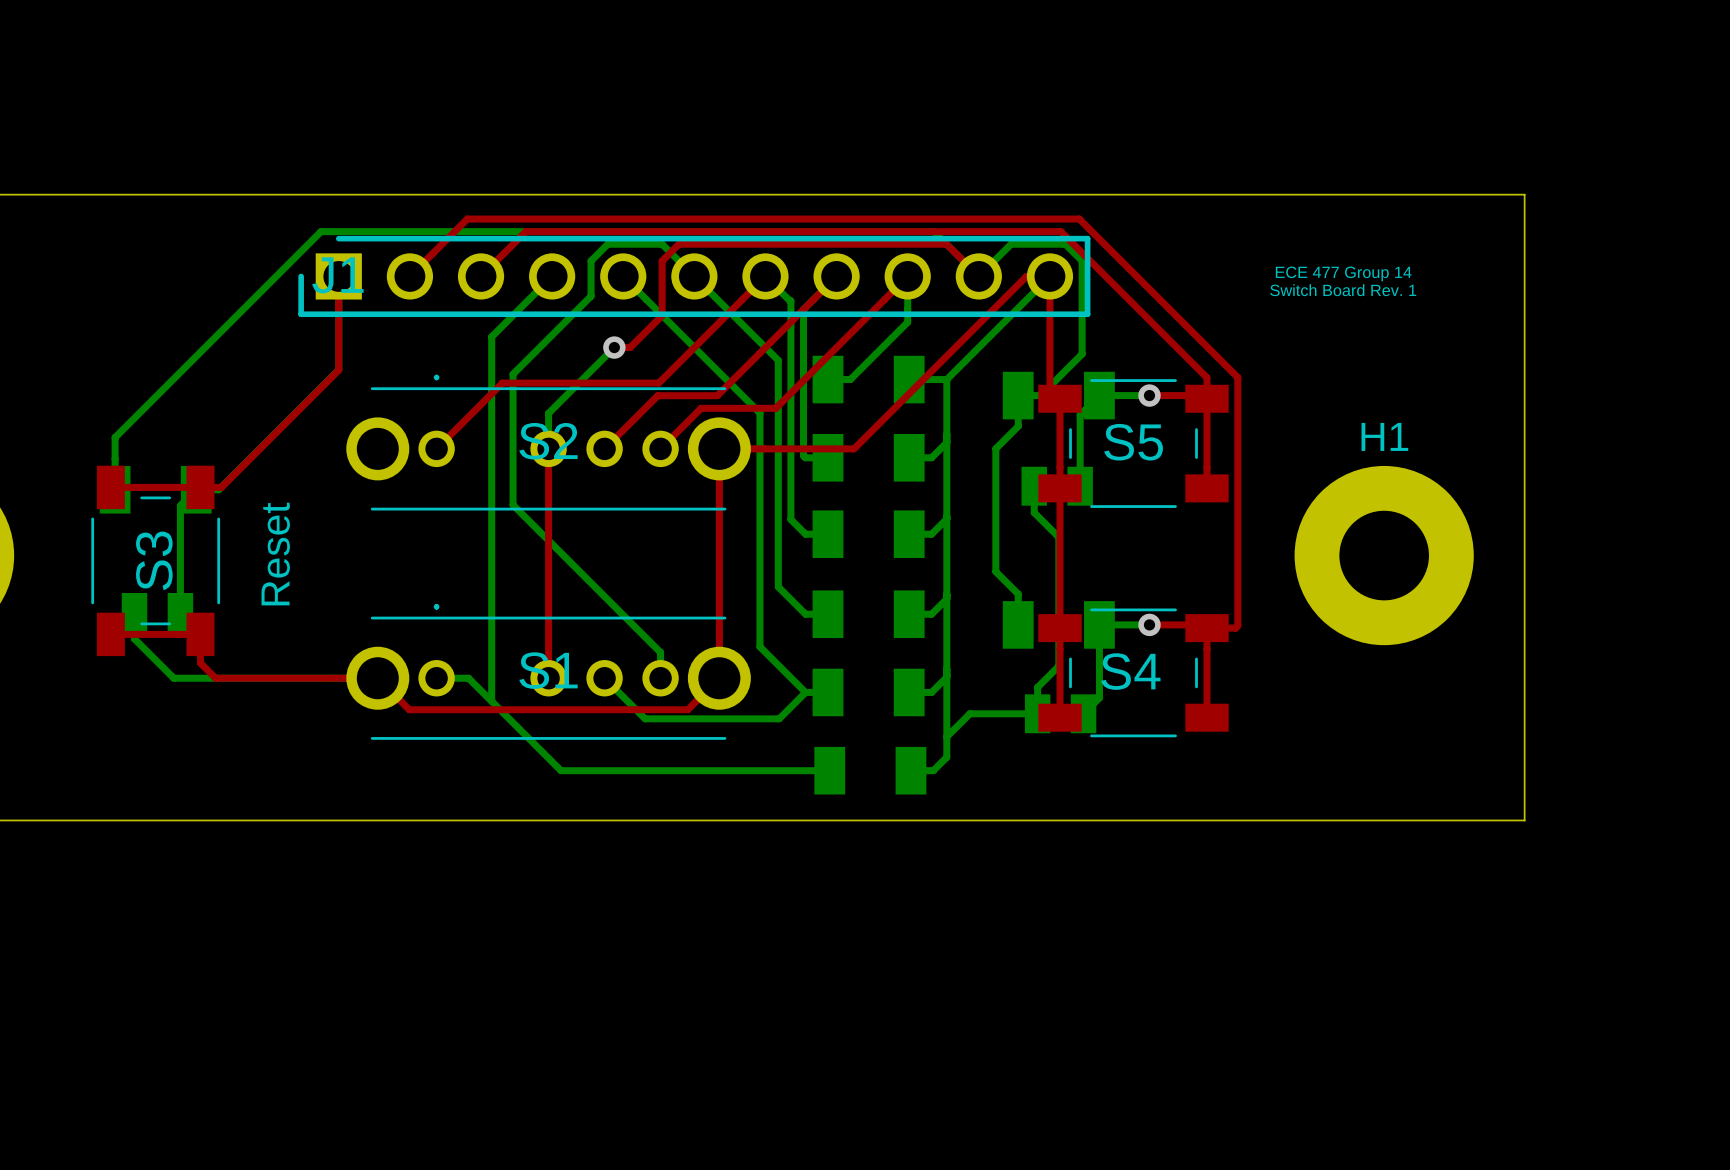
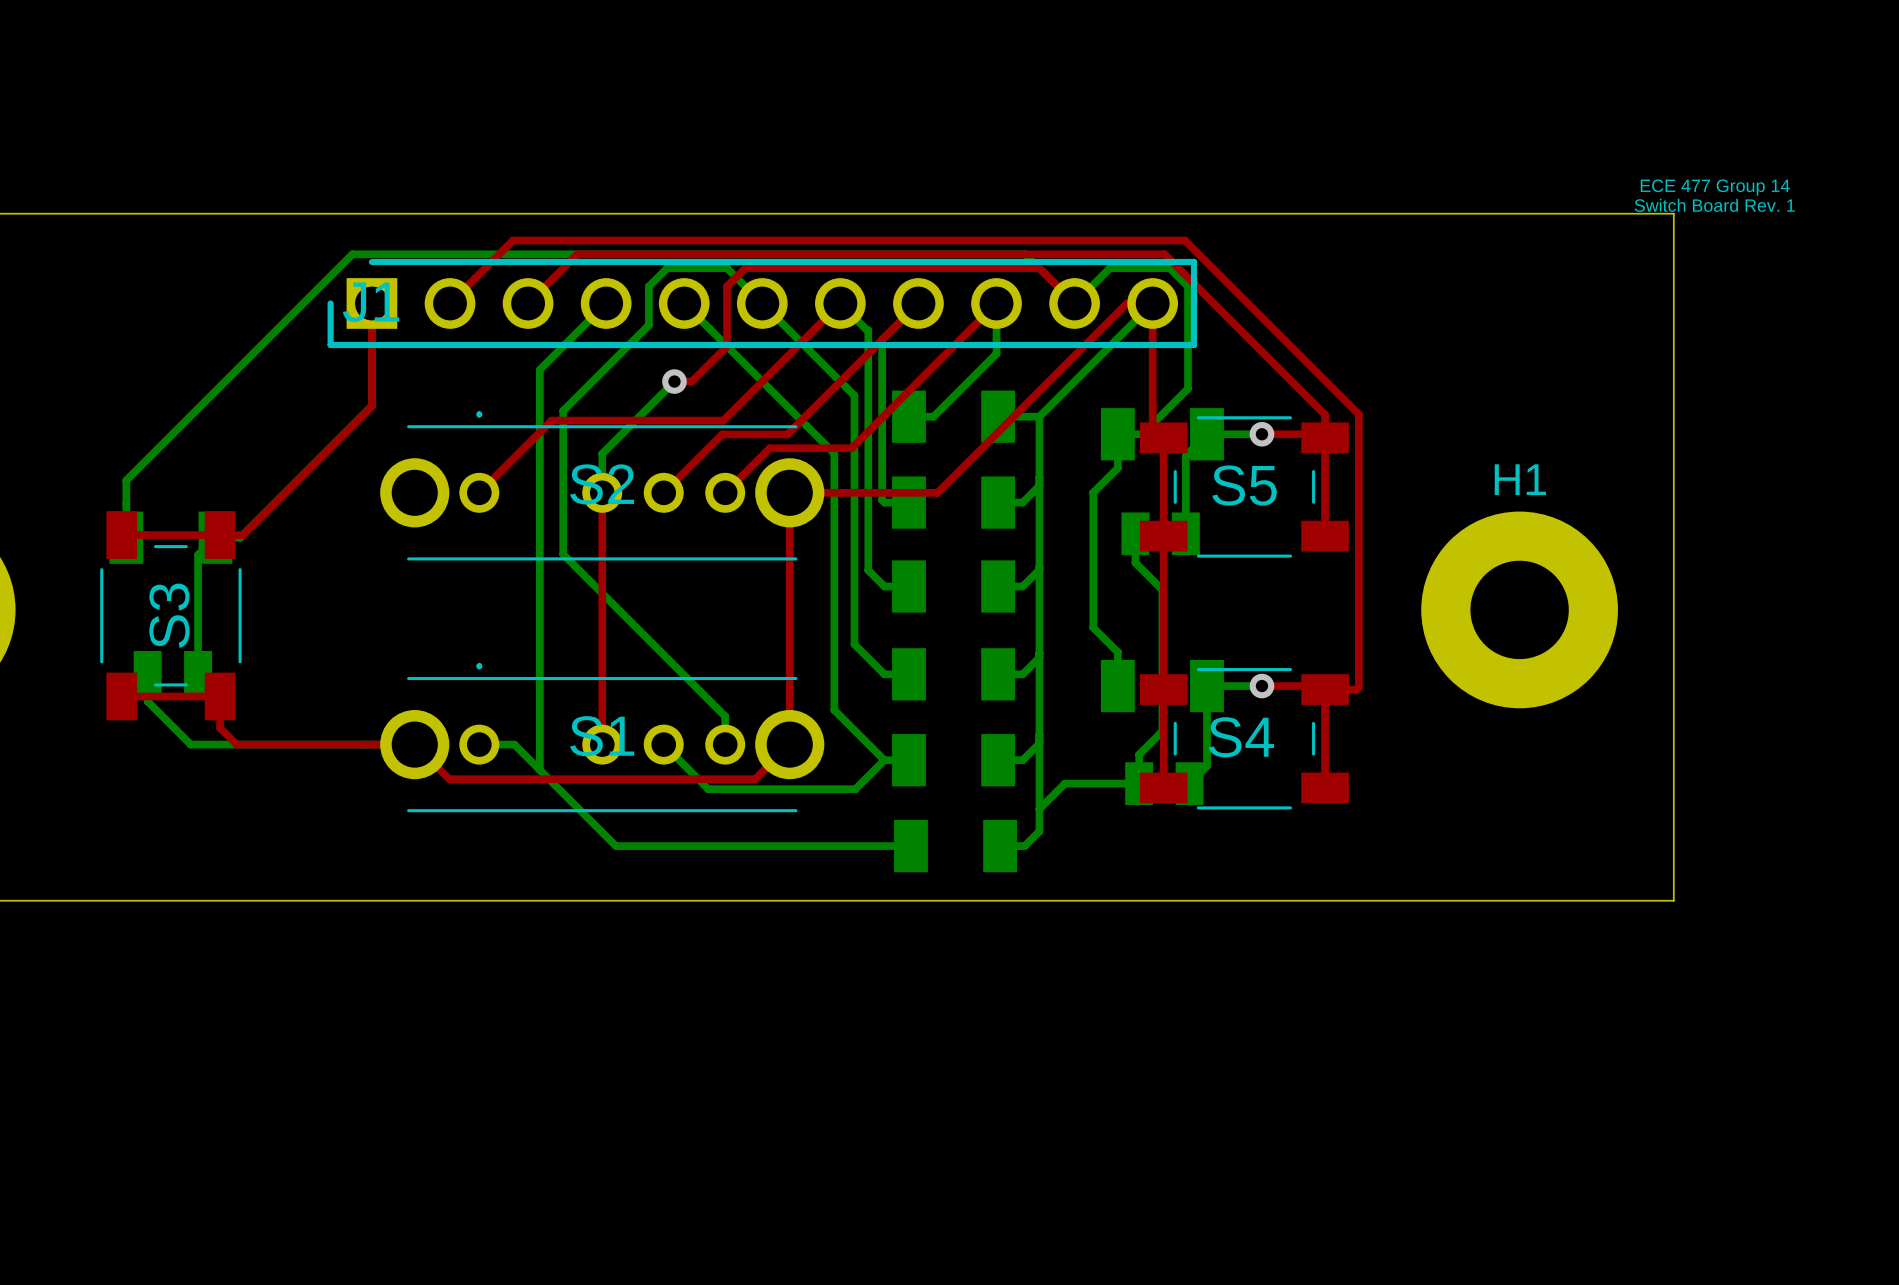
text position: ECE 477 Group 14 (1343, 273) -> ECE 477 Group 14 (1715, 187)
text position: Switch Board Rev. 1 (1343, 290) -> Switch Board Rev. 1 (1714, 205)
text: Reset (275, 554) -> none

